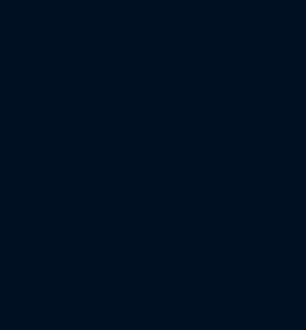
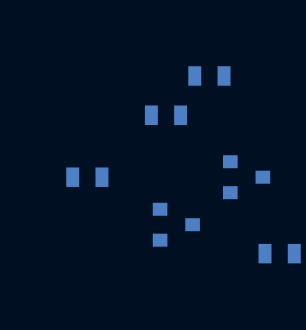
part: none -> (209, 75)
part: none -> (166, 115)
part: none -> (87, 177)
part: none -> (246, 177)
part: none -> (176, 224)
part: none -> (279, 253)

